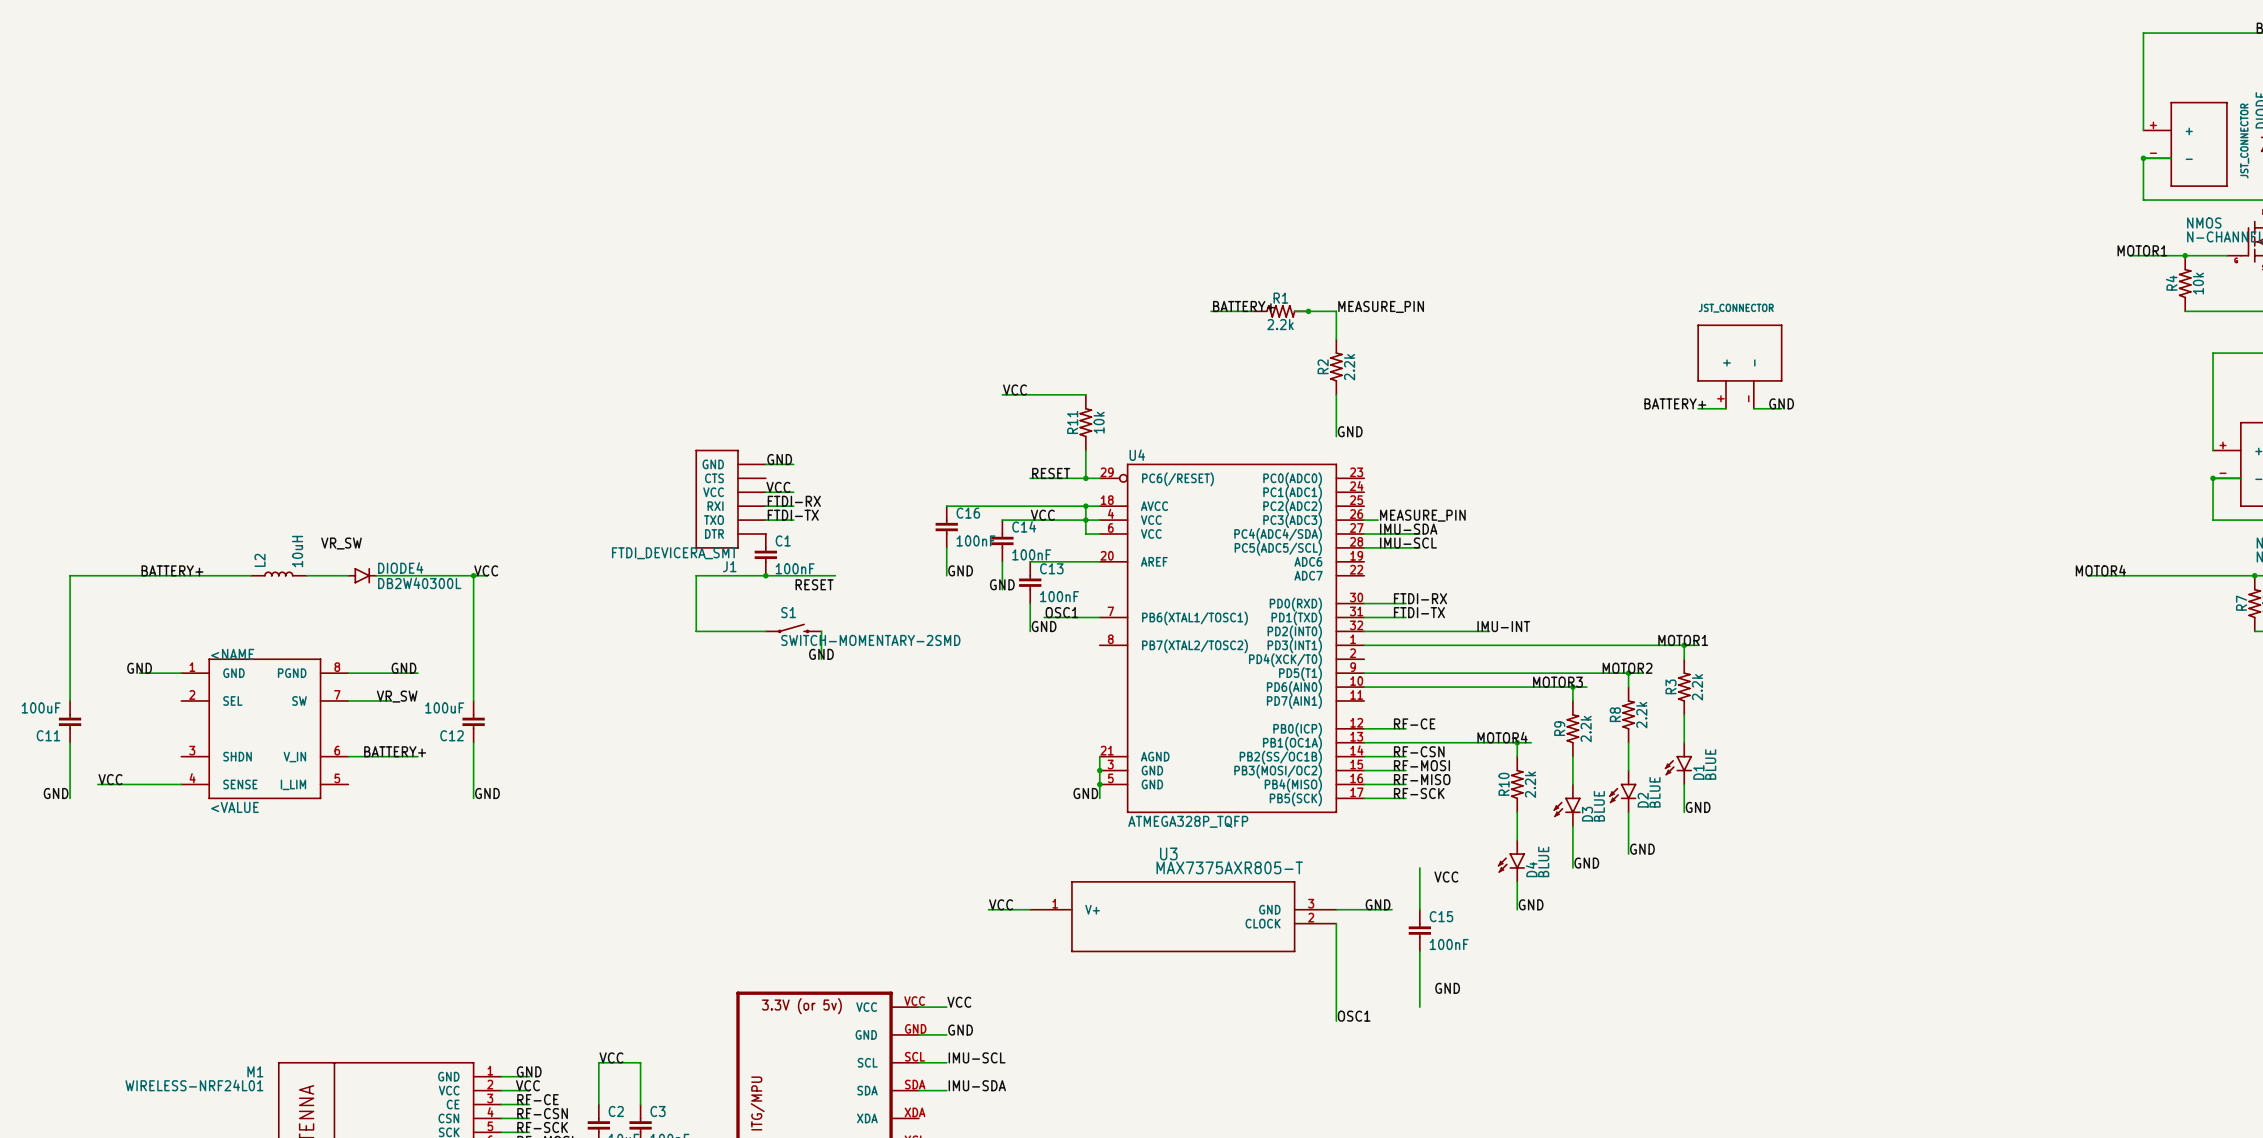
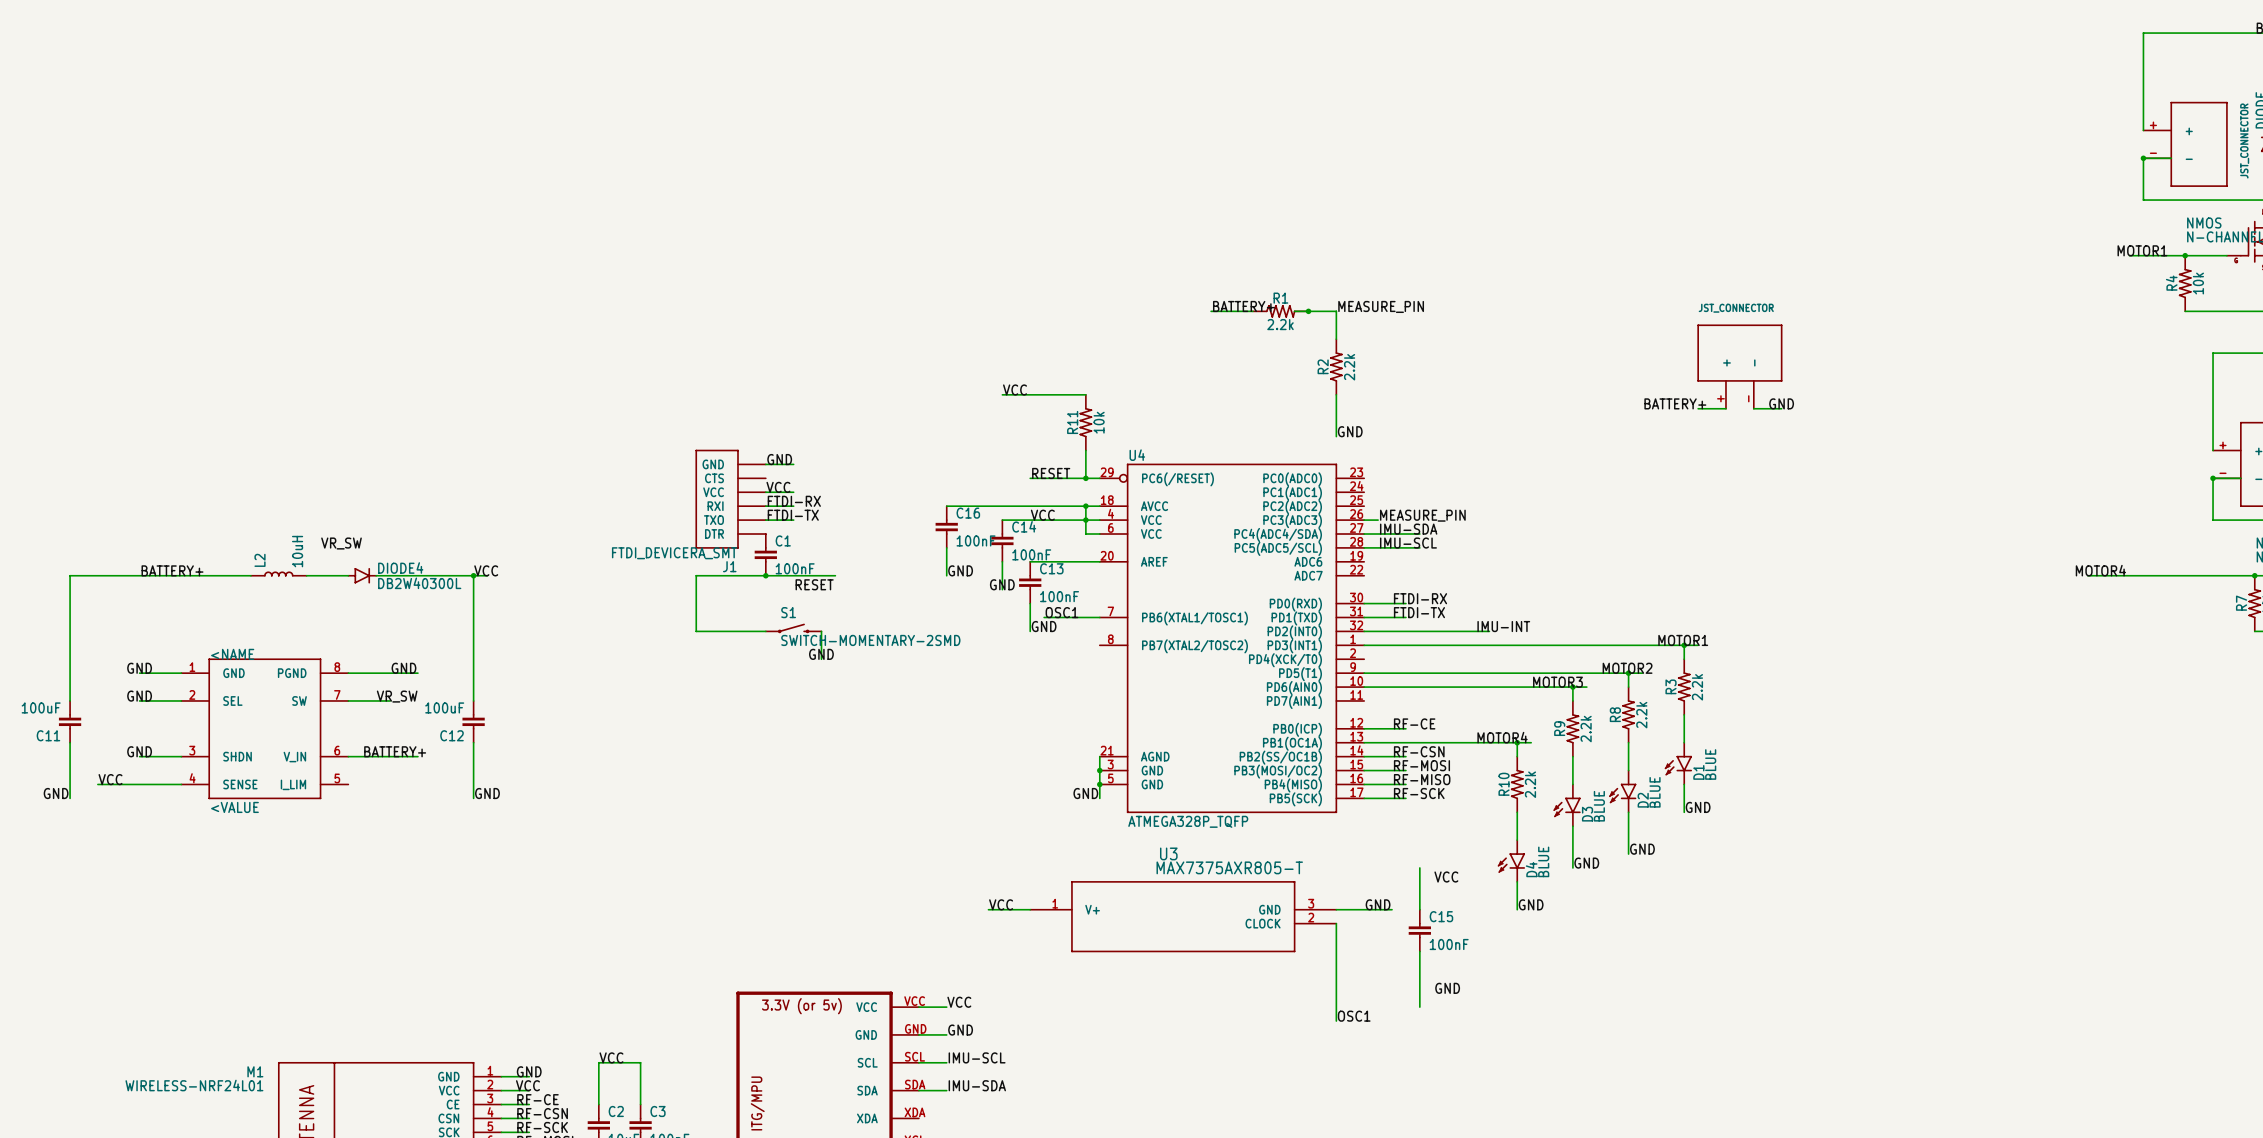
label: none -> GND (139, 696)
wire: none -> (139, 700) (181, 700)
label: none -> GND (139, 751)
wire: none -> (139, 756) (181, 756)

